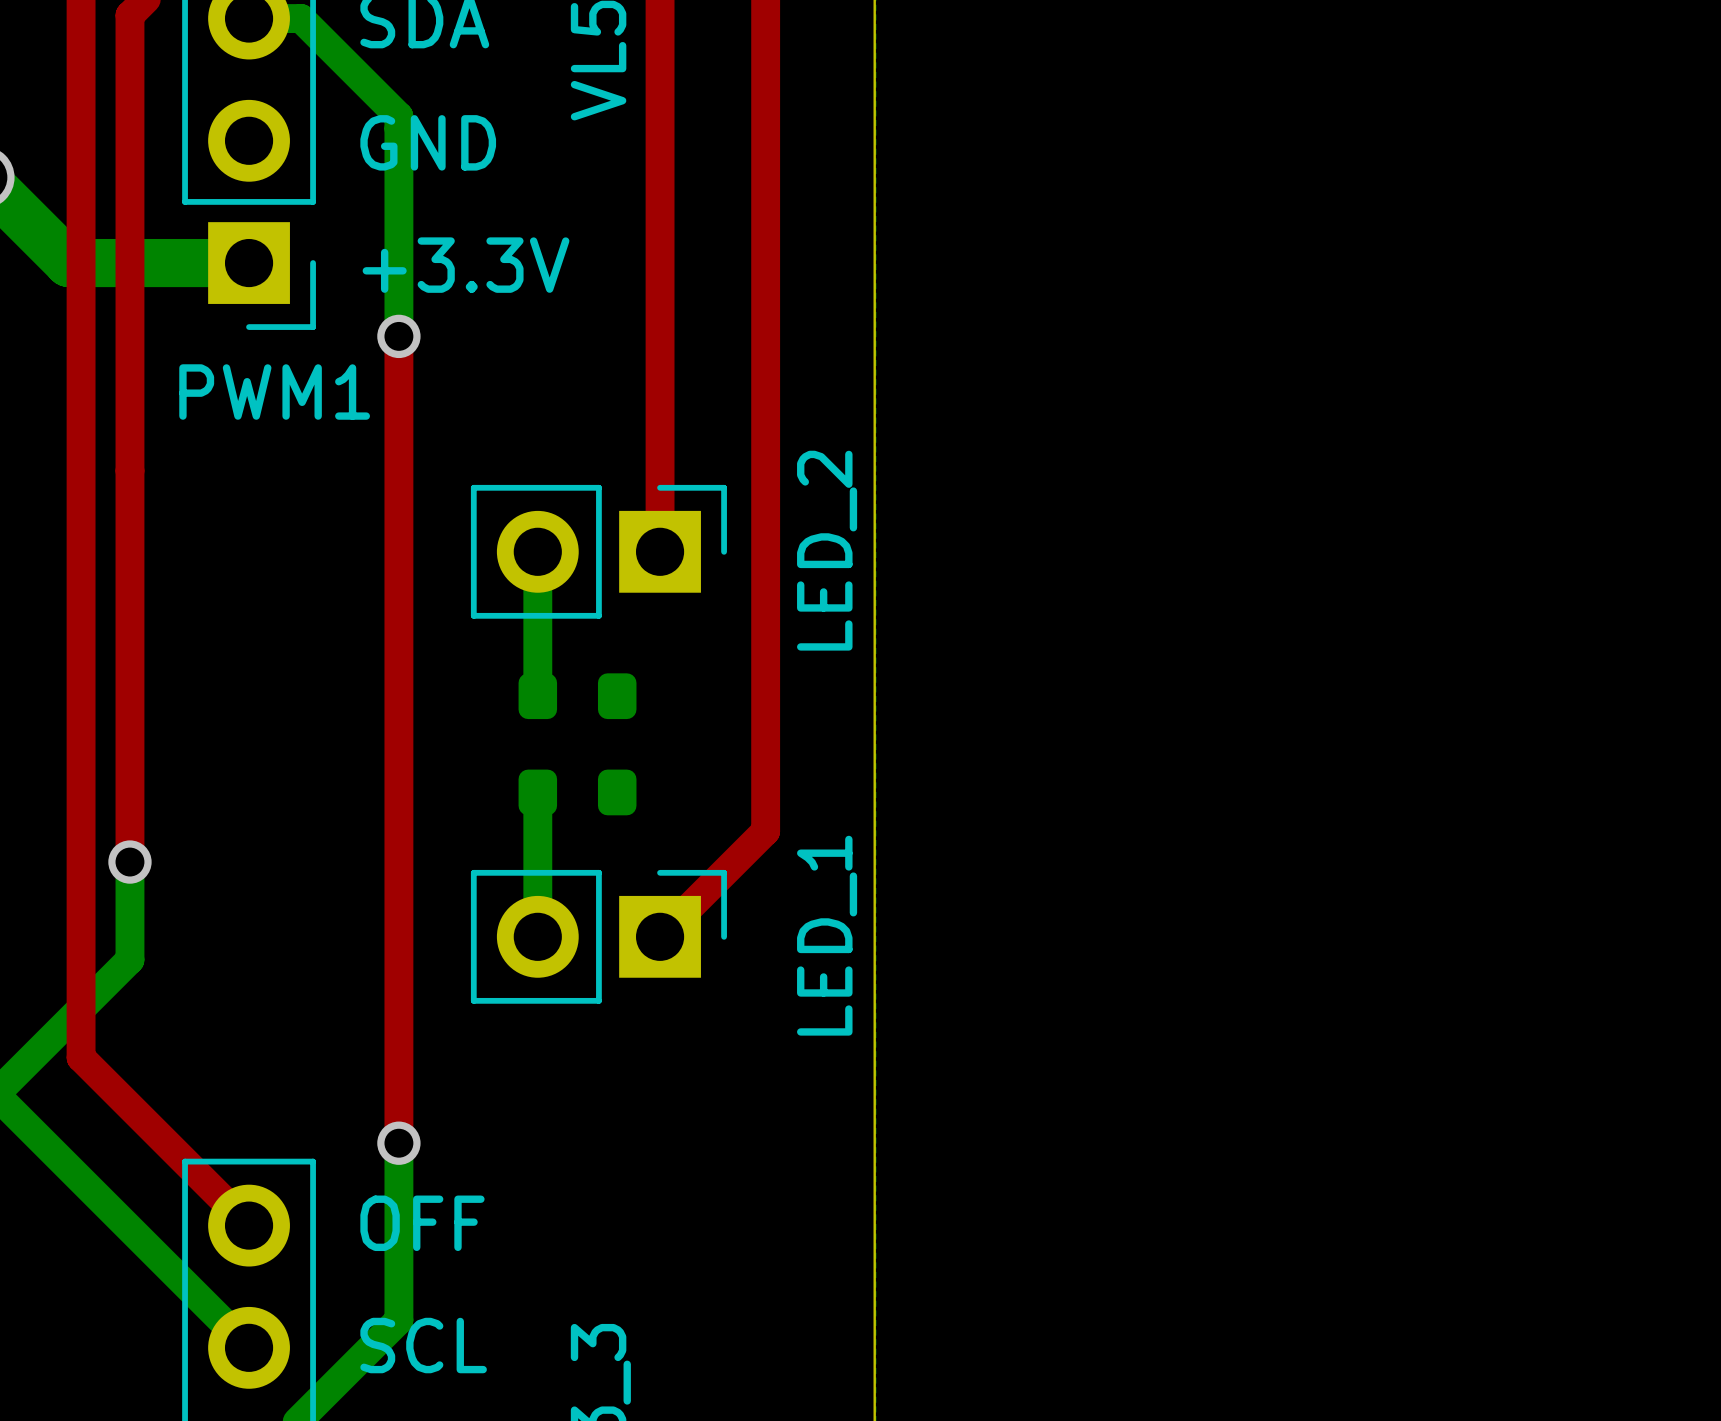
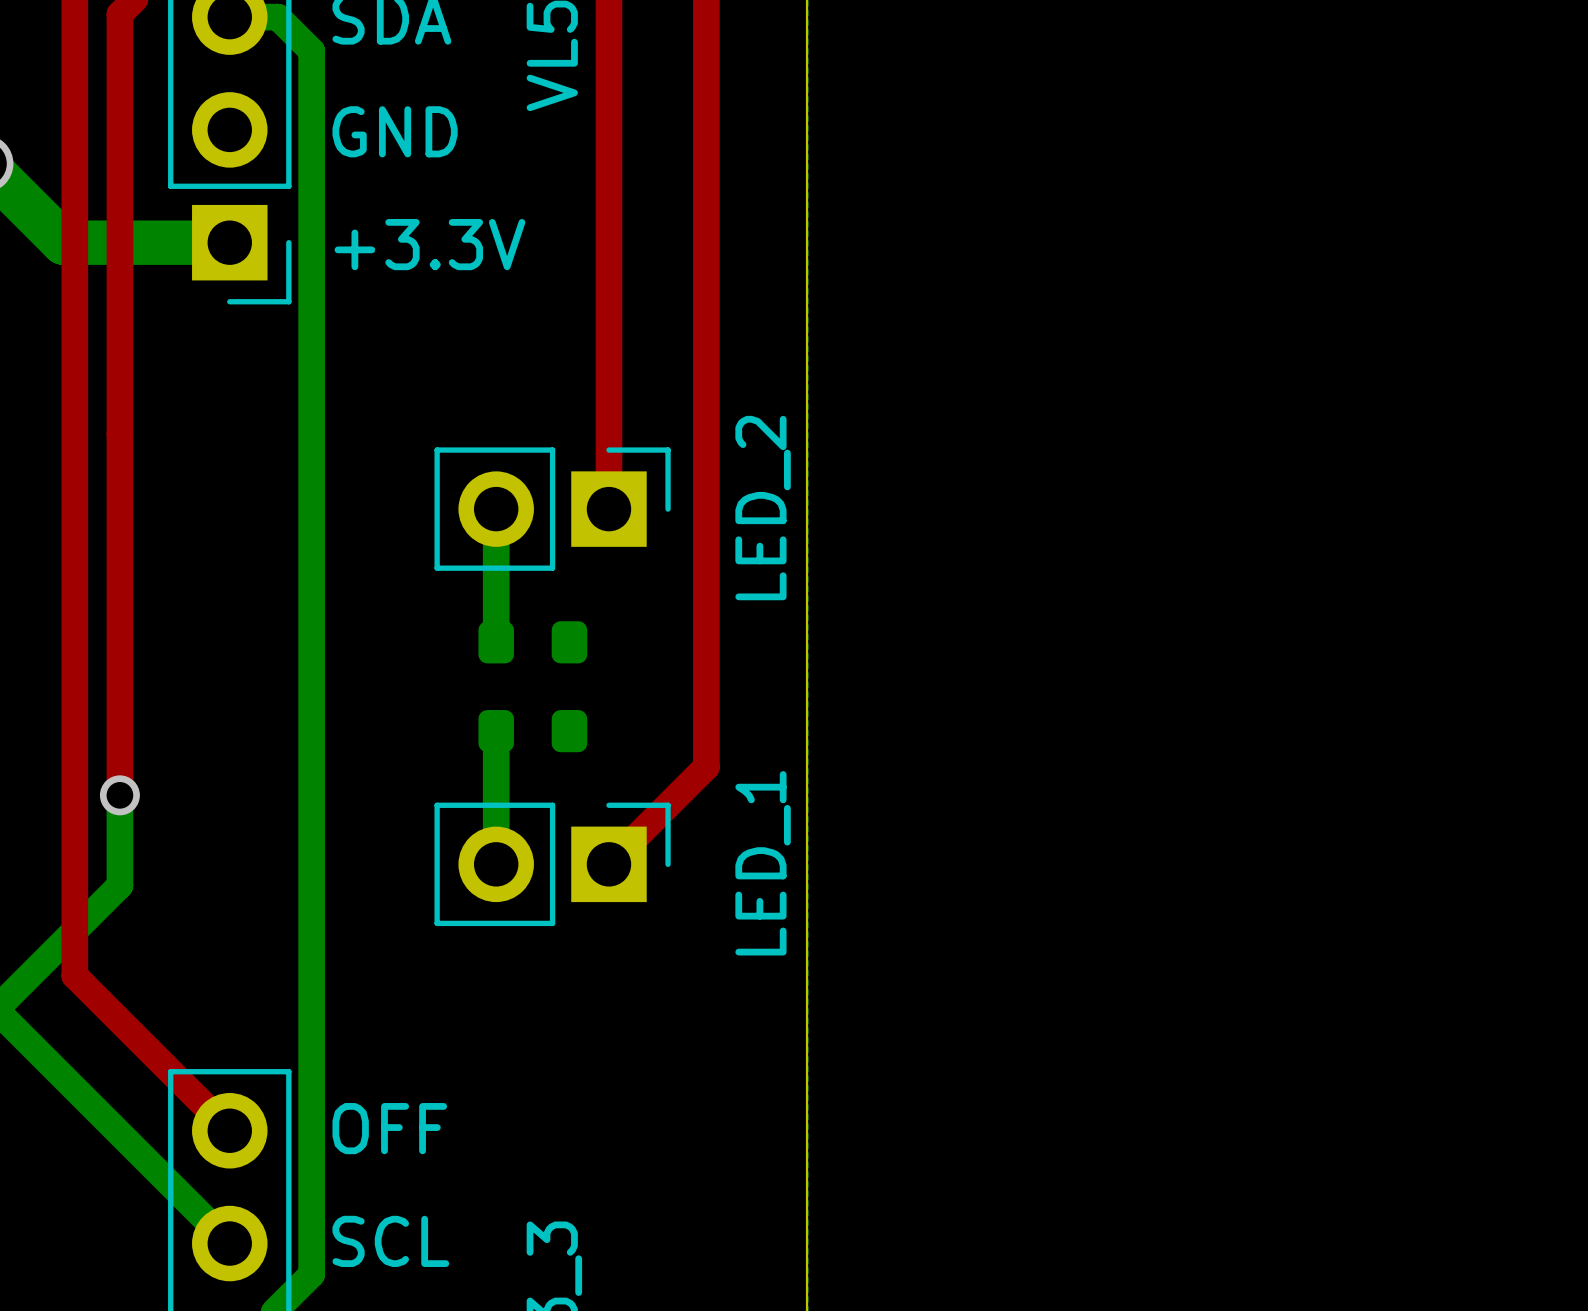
bottom track: (337, 55) (398, 116) (398, 336) -> (311, 50) (311, 1274)
top track: (398, 336) (398, 1143) -> none
via: (398, 336) -> none
text: PWM1 (274, 392) -> none
bottom track: (398, 1143) (398, 1320) (337, 1381) -> none
via: (398, 1143) -> none

